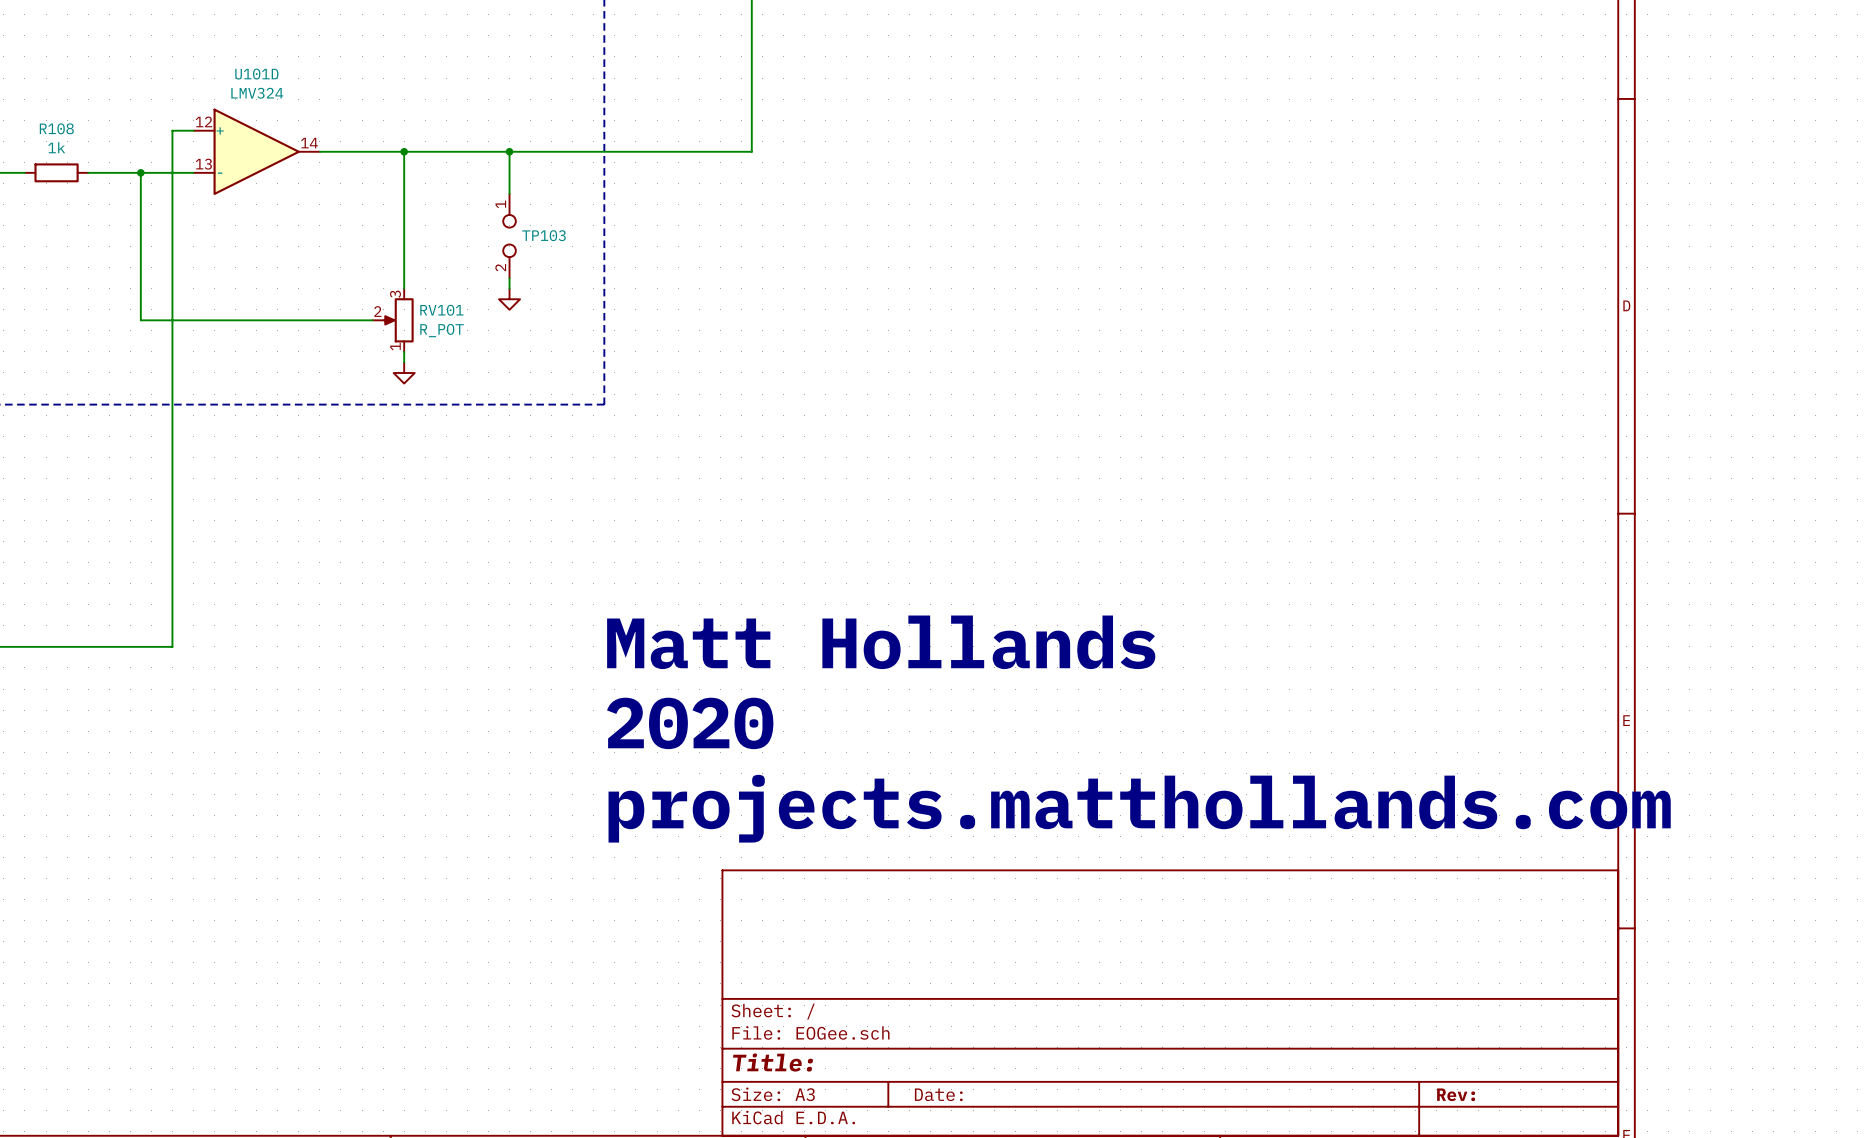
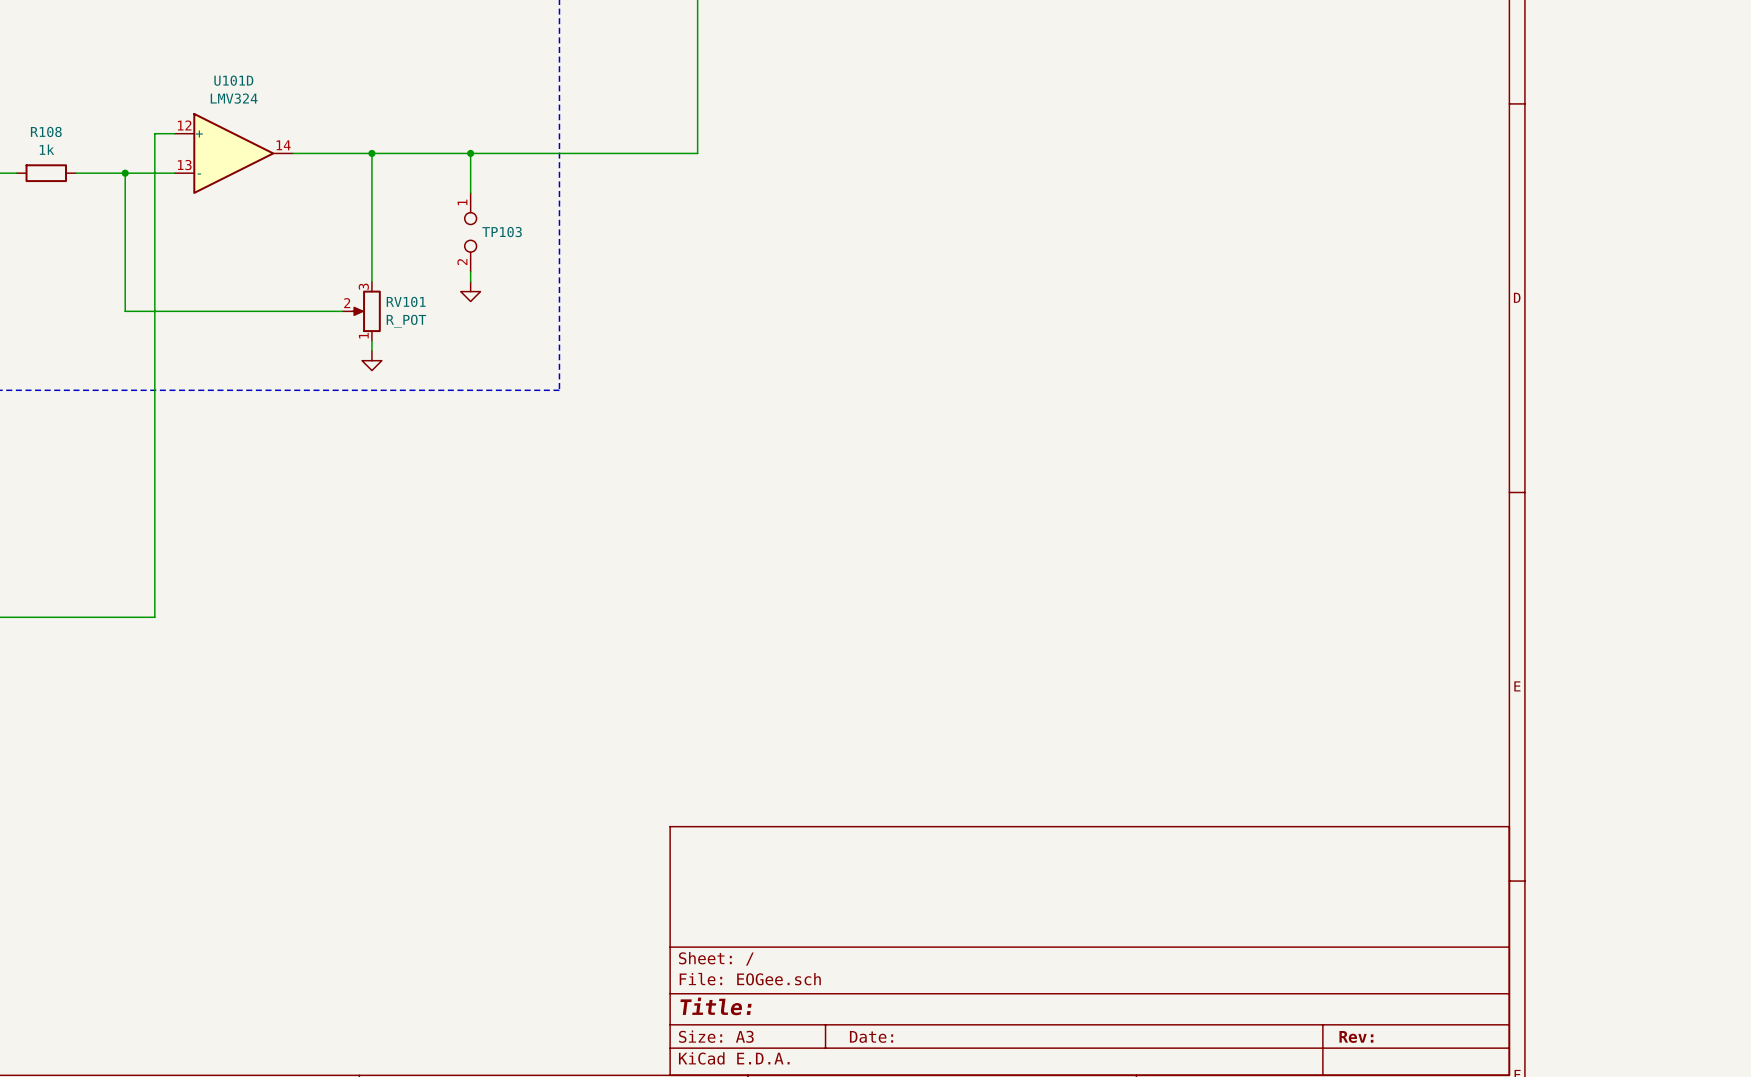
text: Matt Hollands (881, 642) -> none
text: 2020 (690, 723) -> none
text: projects.matthollands.com (1139, 808) -> none

